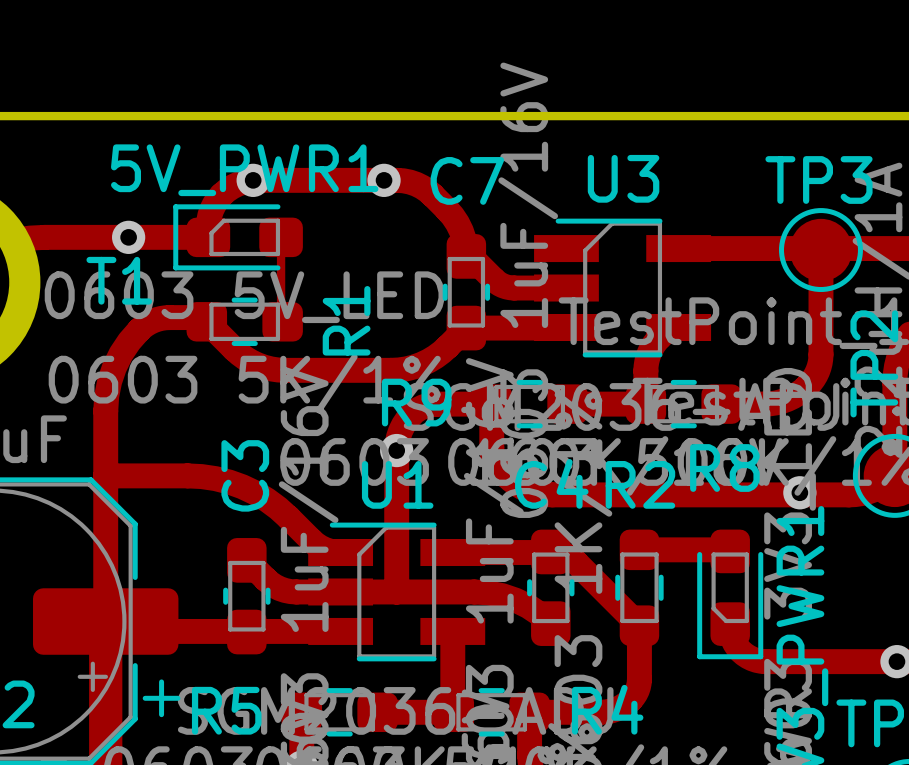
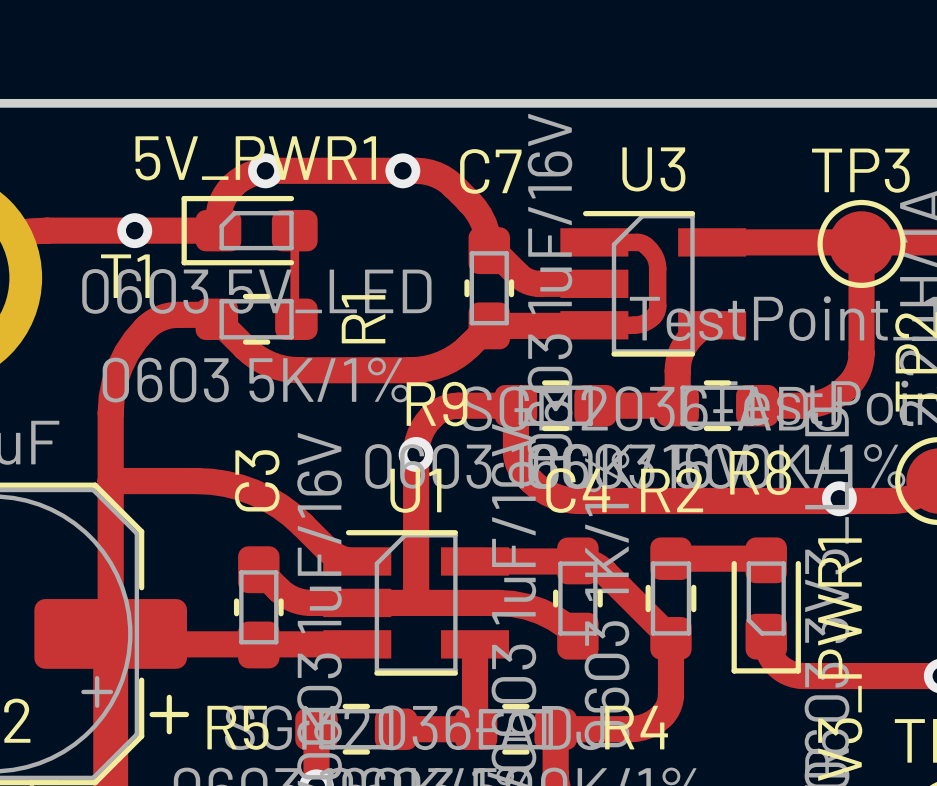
track: none -> (594, 242) (642, 243) (653, 253) (657, 268) (657, 307) (653, 317) (637, 325) (594, 325)

